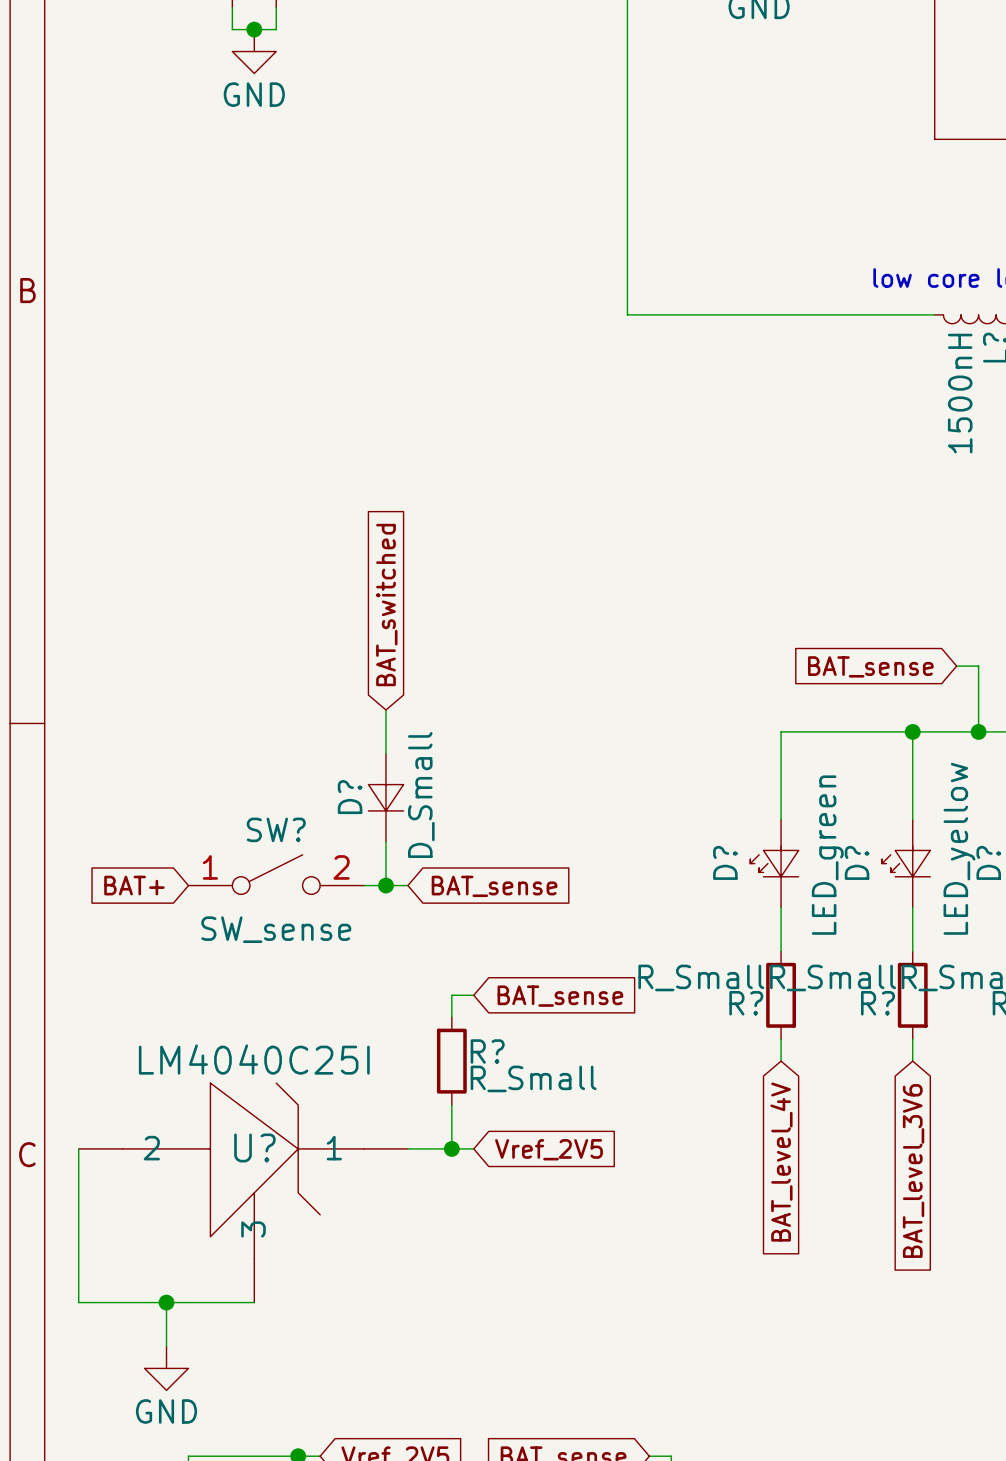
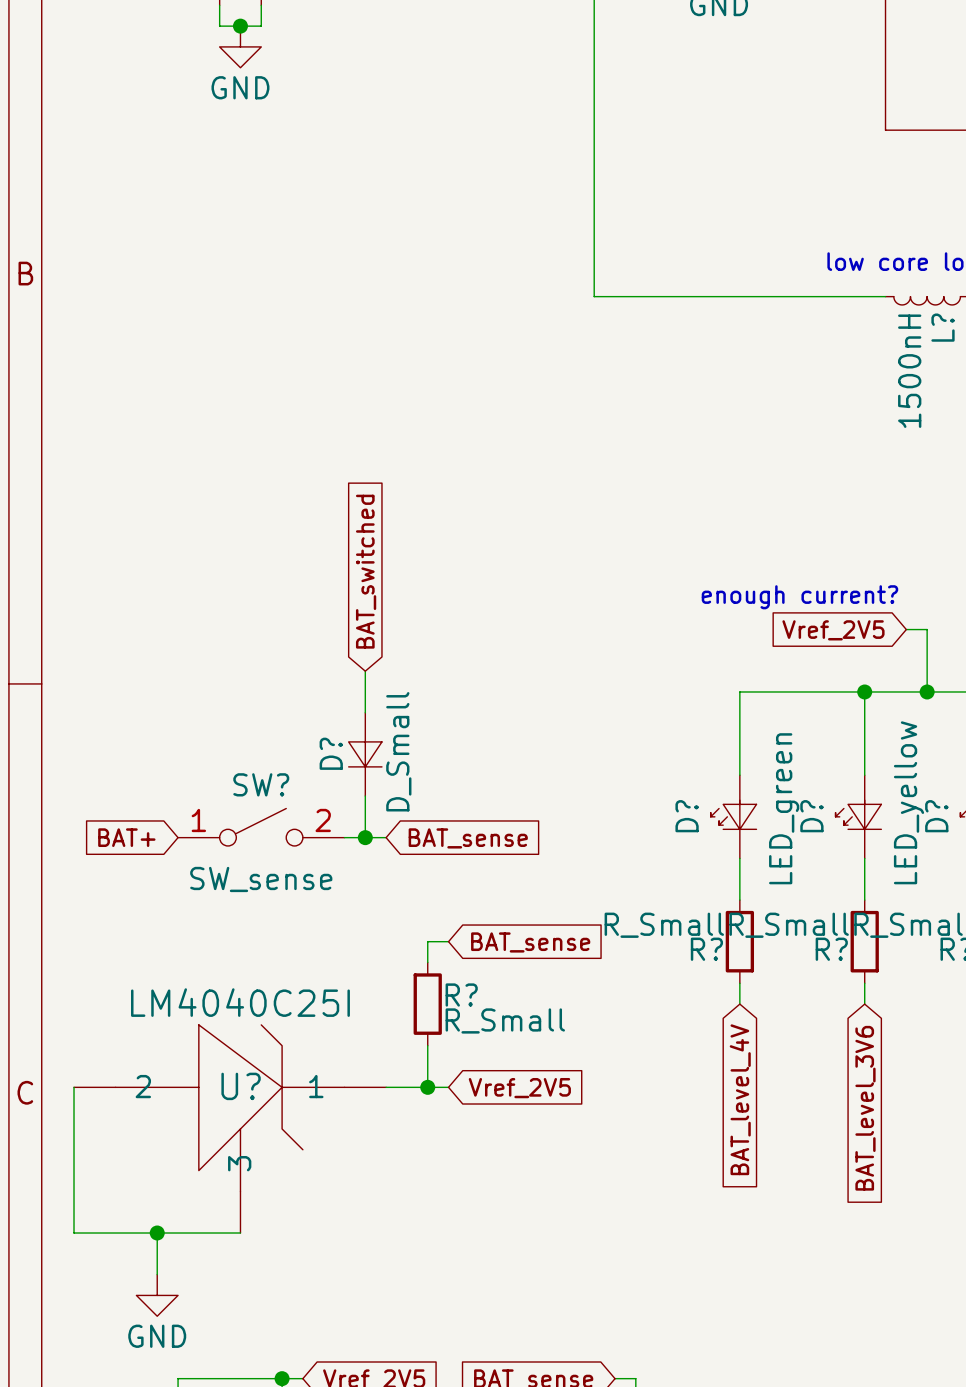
text: none -> enough current? (799, 597)
global label: BAT_sense (870, 666) -> Vref_2V5 (833, 630)

